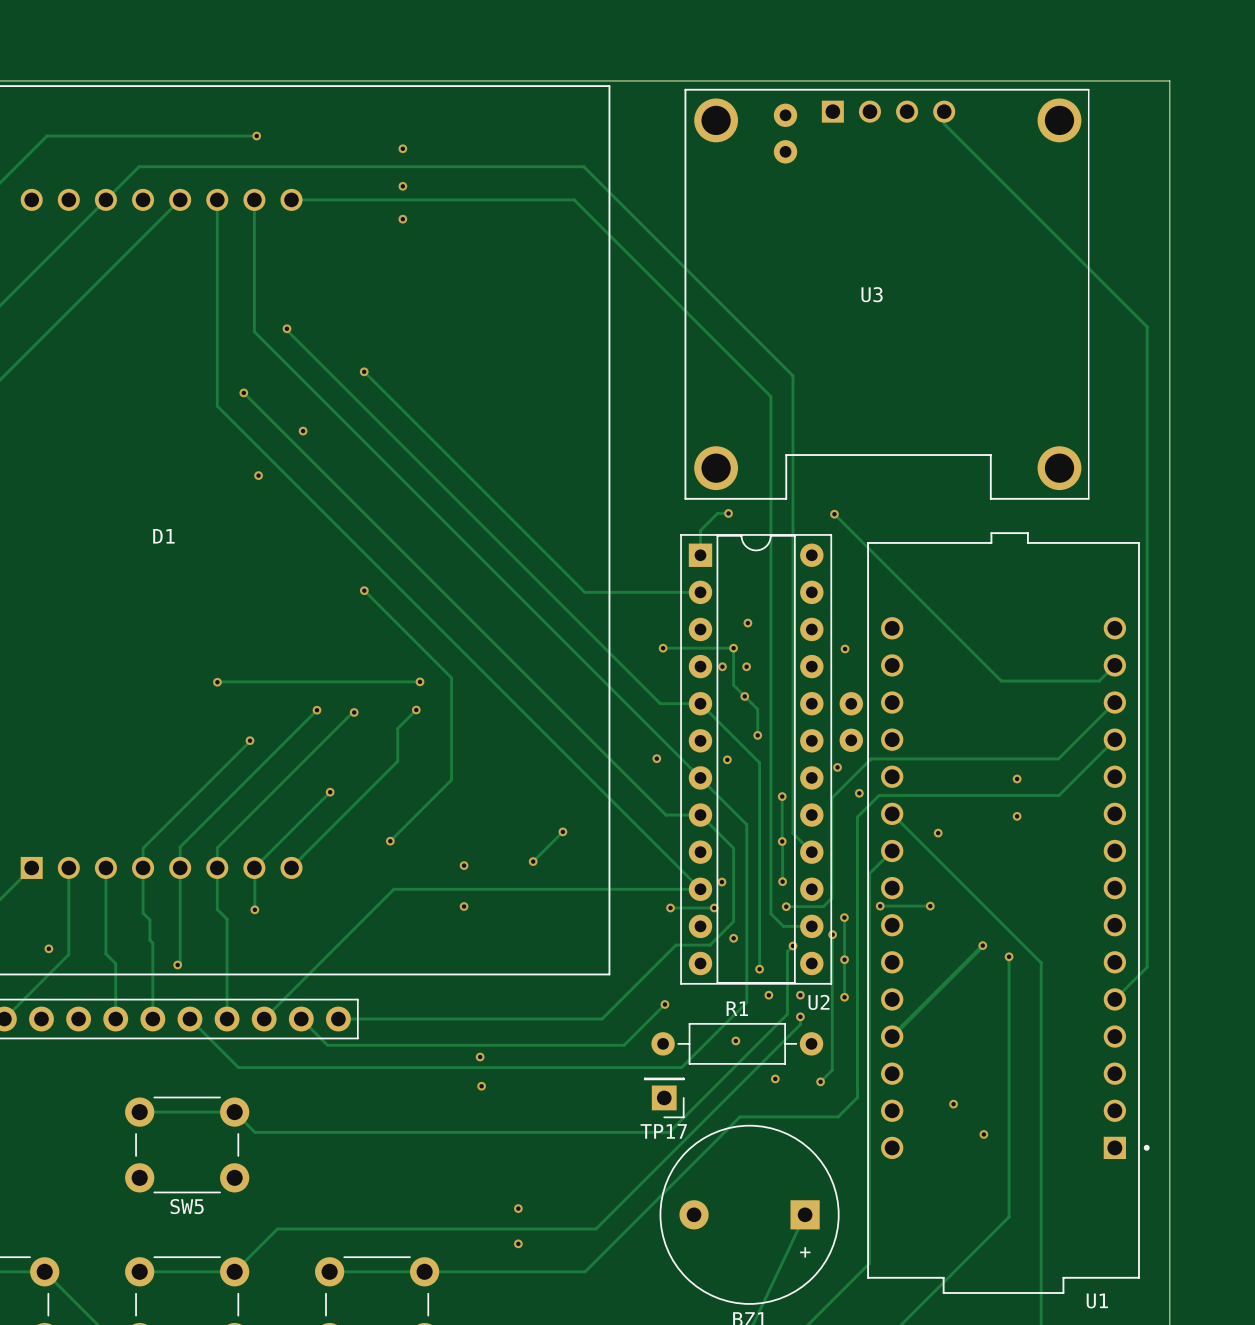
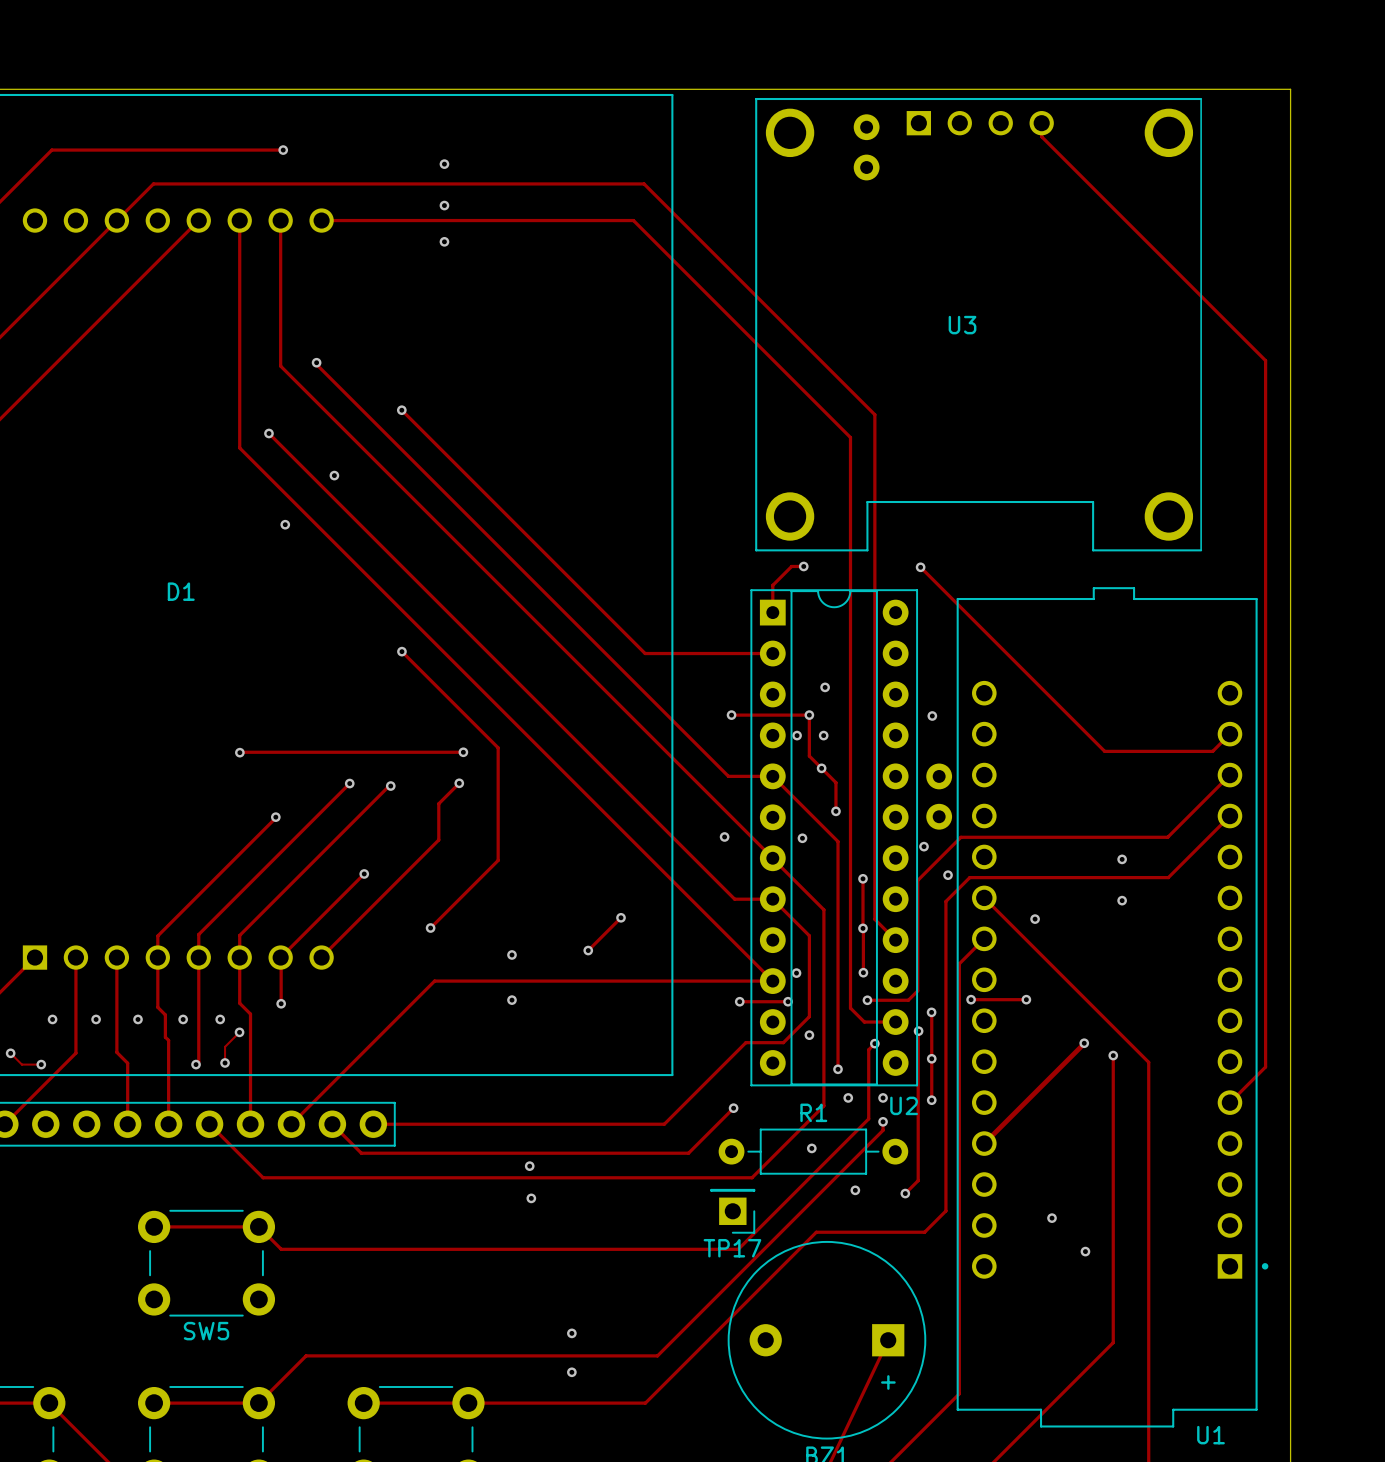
via: none -> (52, 1019)
via: none -> (96, 1019)
via: none -> (138, 1019)
via: none -> (183, 1019)
via: none -> (220, 1019)
track: none -> (239, 1032) (225, 1046) (225, 1062)
via: none -> (239, 1032)
via: (48, 948) -> none
track: none -> (10, 1053) (21, 1064) (41, 1064)
via: none -> (10, 1053)
via: none -> (225, 1062)
via: none -> (41, 1064)

